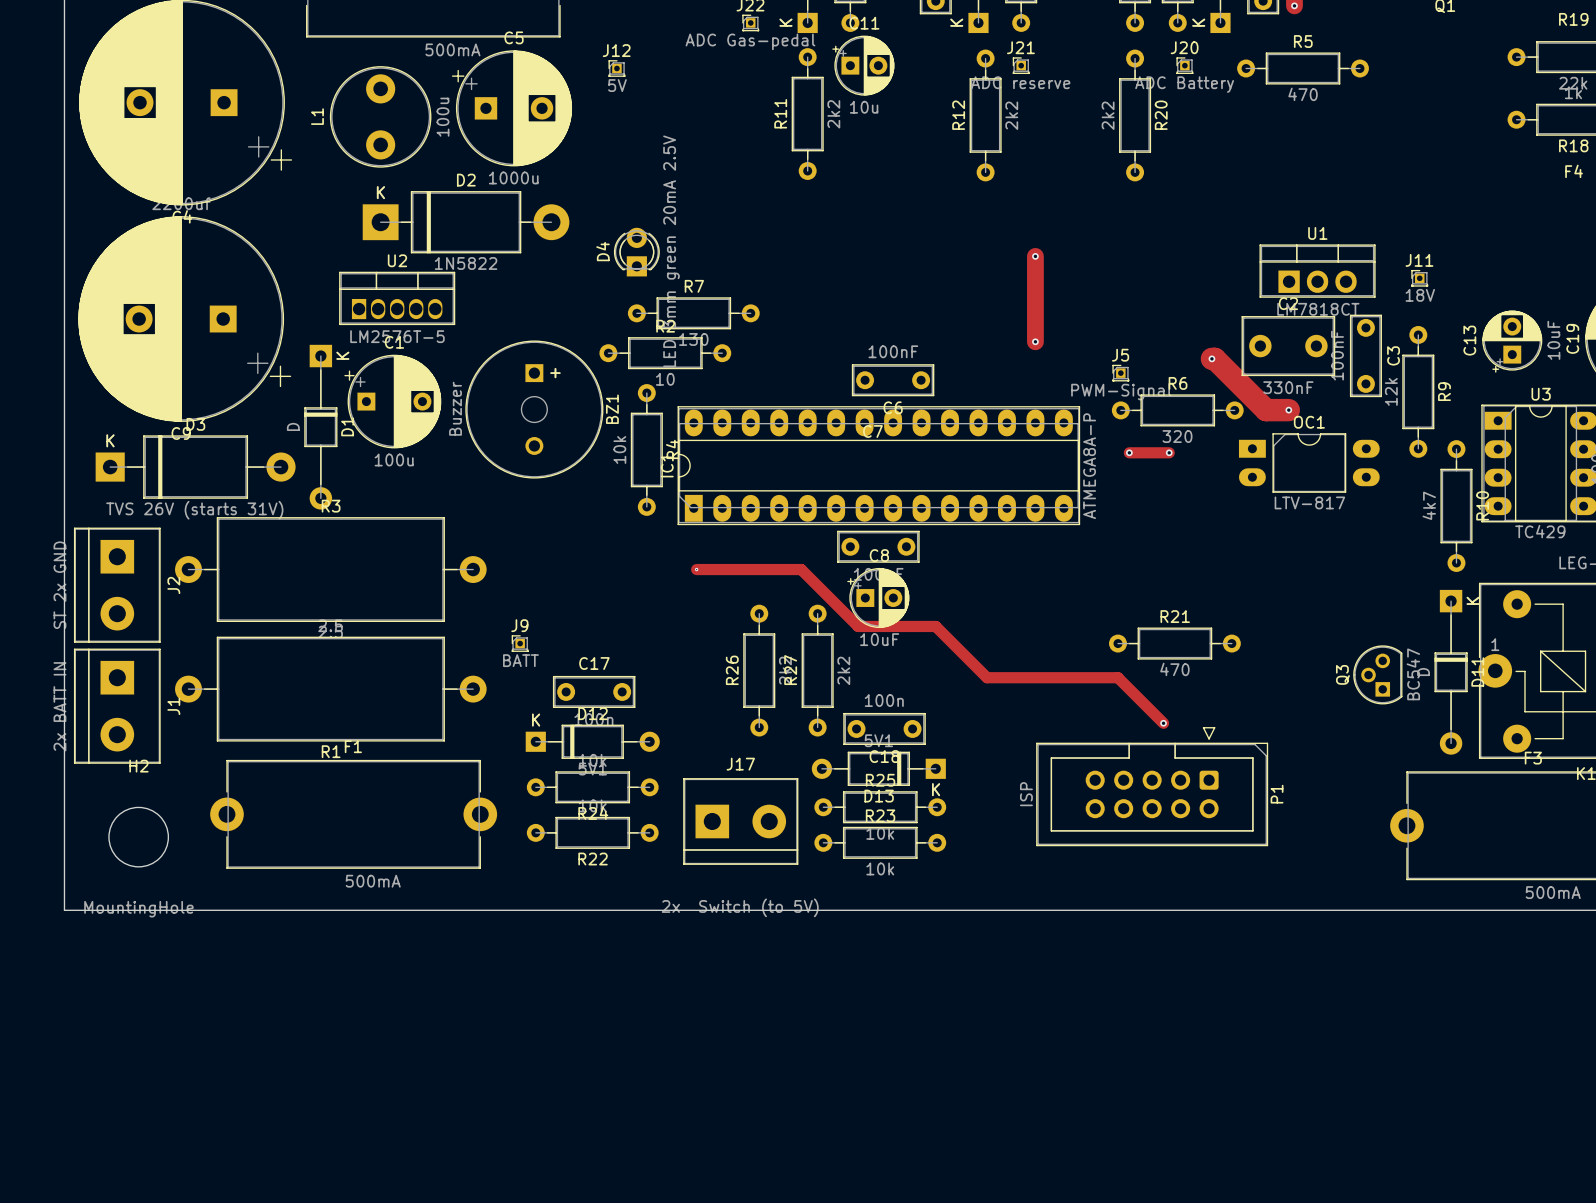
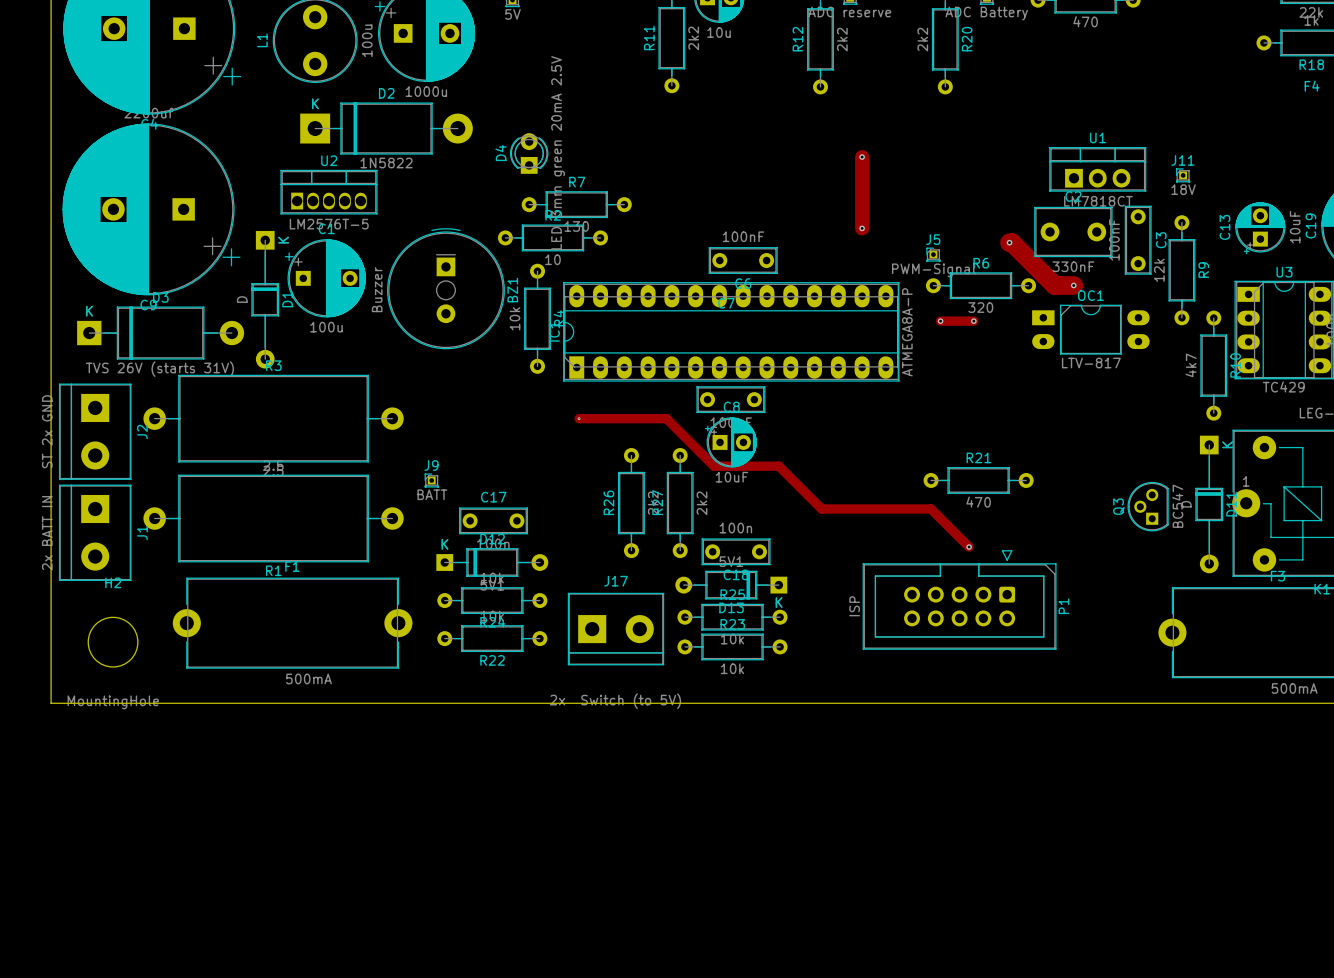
BZ1 footprint: [465, 340, 604, 479] -> [387, 228, 505, 350]

